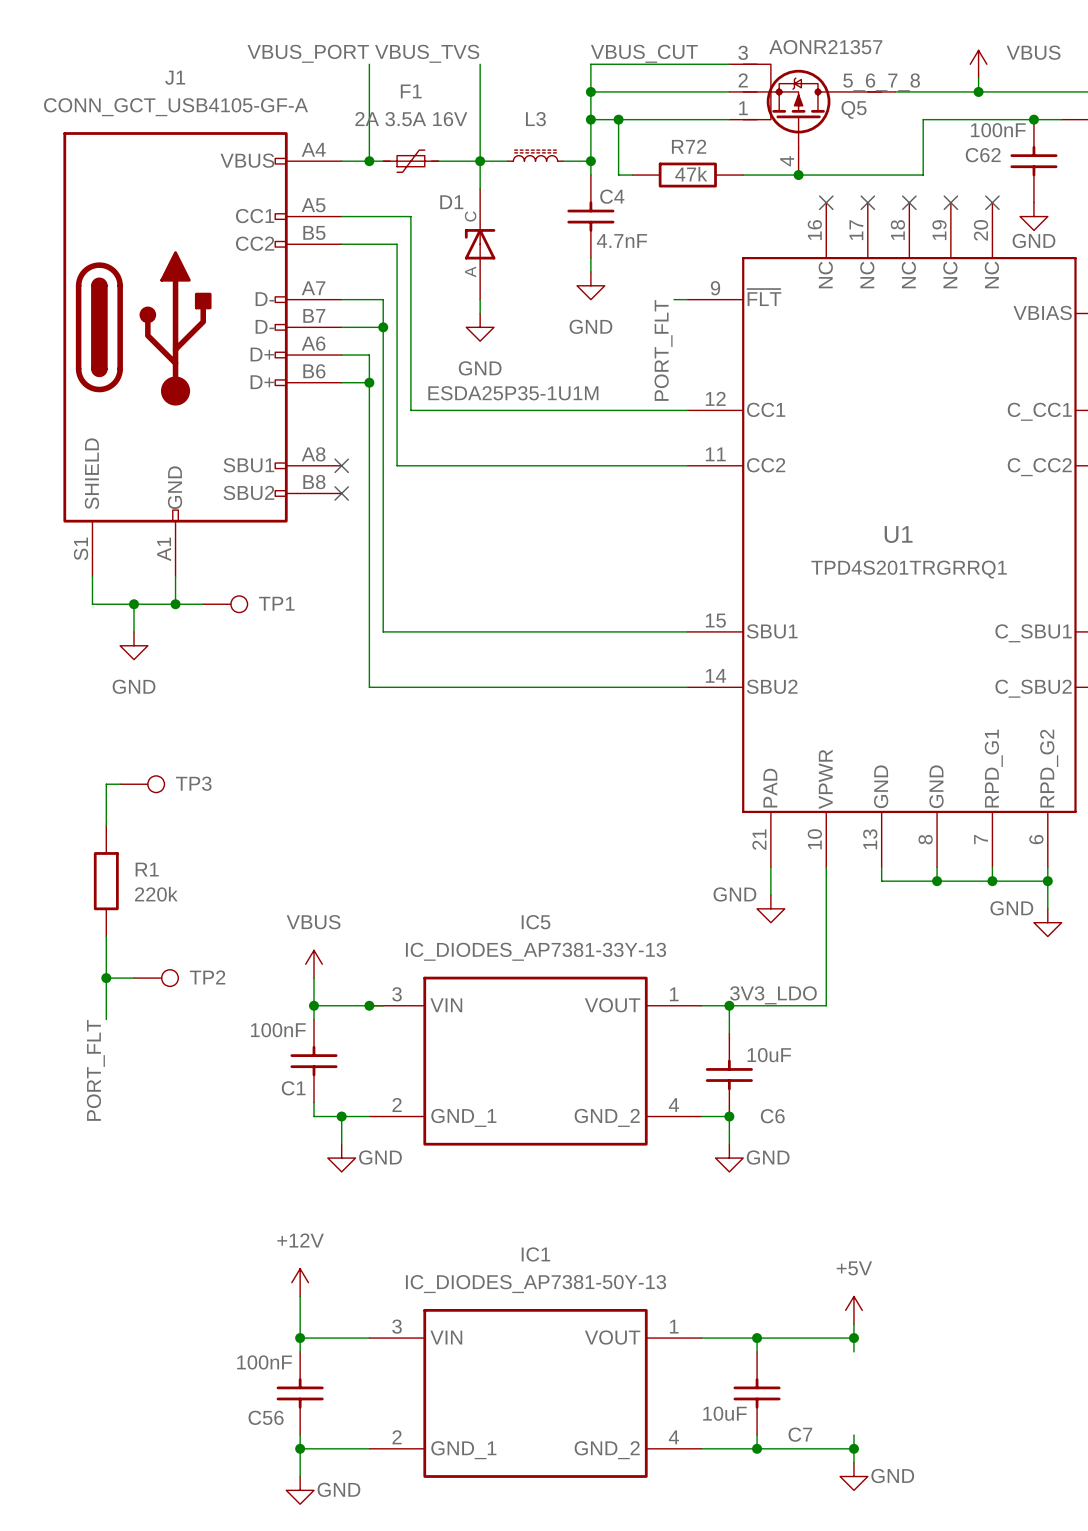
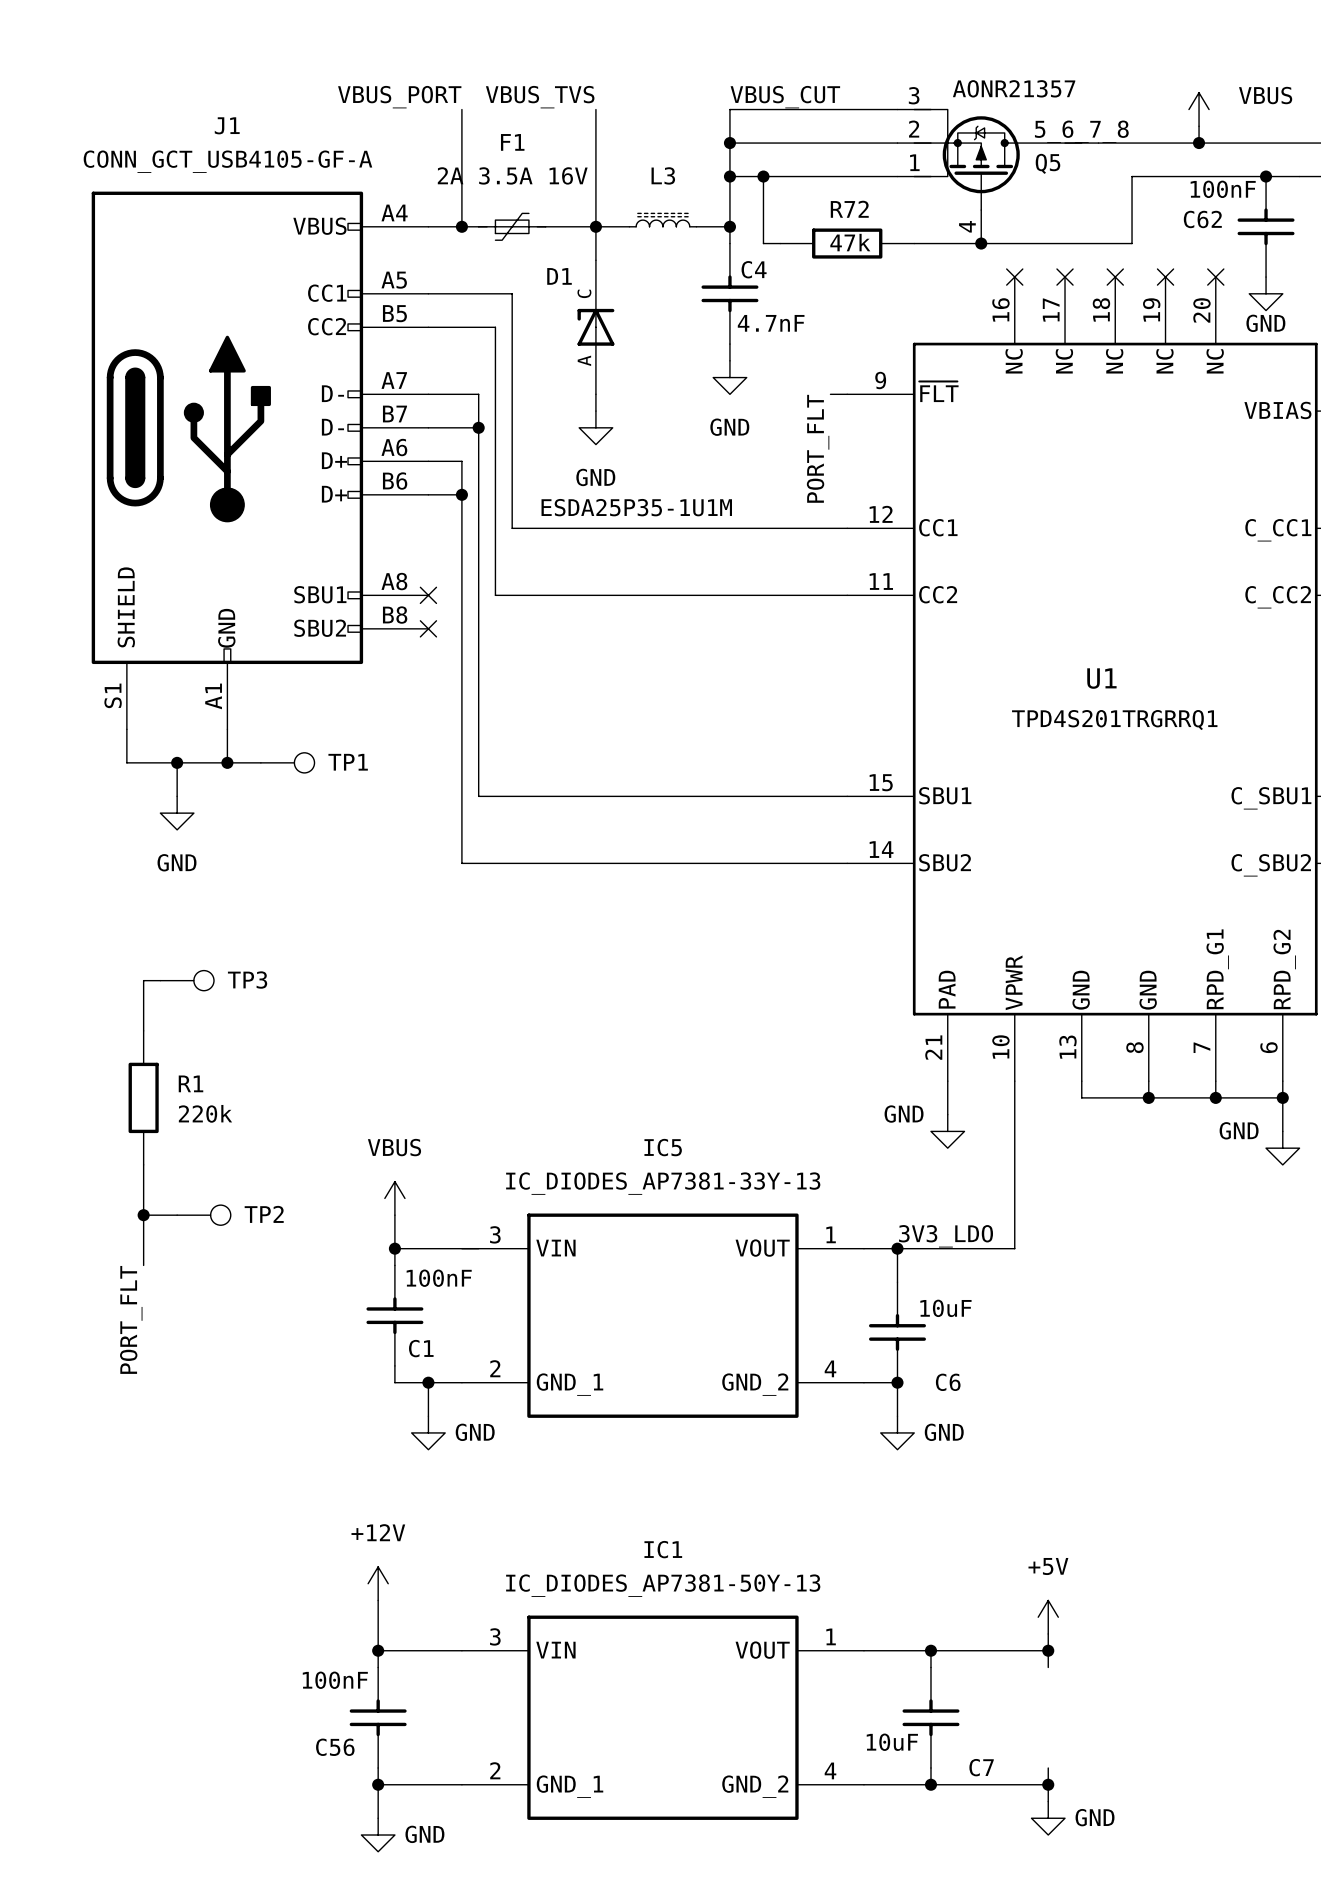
junction: (369, 1005) -> none
C1 text position: 100nF (278, 1030) -> 100nF (439, 1278)
C1 name position: C1 (293, 1088) -> C1 (421, 1348)

